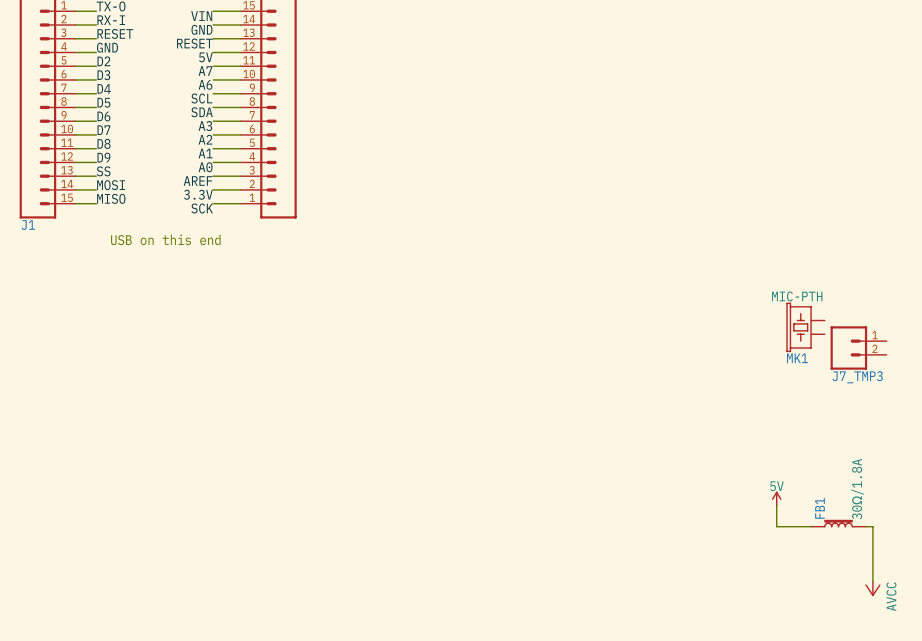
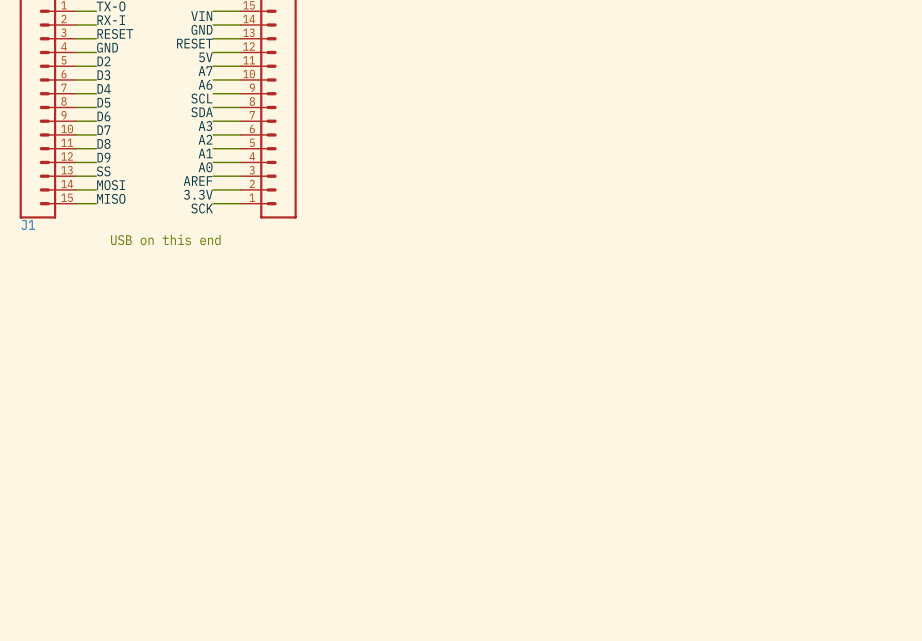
MK1: MIC-PTH (805, 327) -> none
J7_TMP3: (858, 348) -> none
power symbol: 5V (776, 498) -> none
wire: (776, 506) (776, 526) (811, 526) -> none
FB1: 30Ω/1.8A (838, 523) -> none
wire: (866, 526) (872, 526) (872, 581) -> none
power symbol: AVCC (872, 588) -> none

